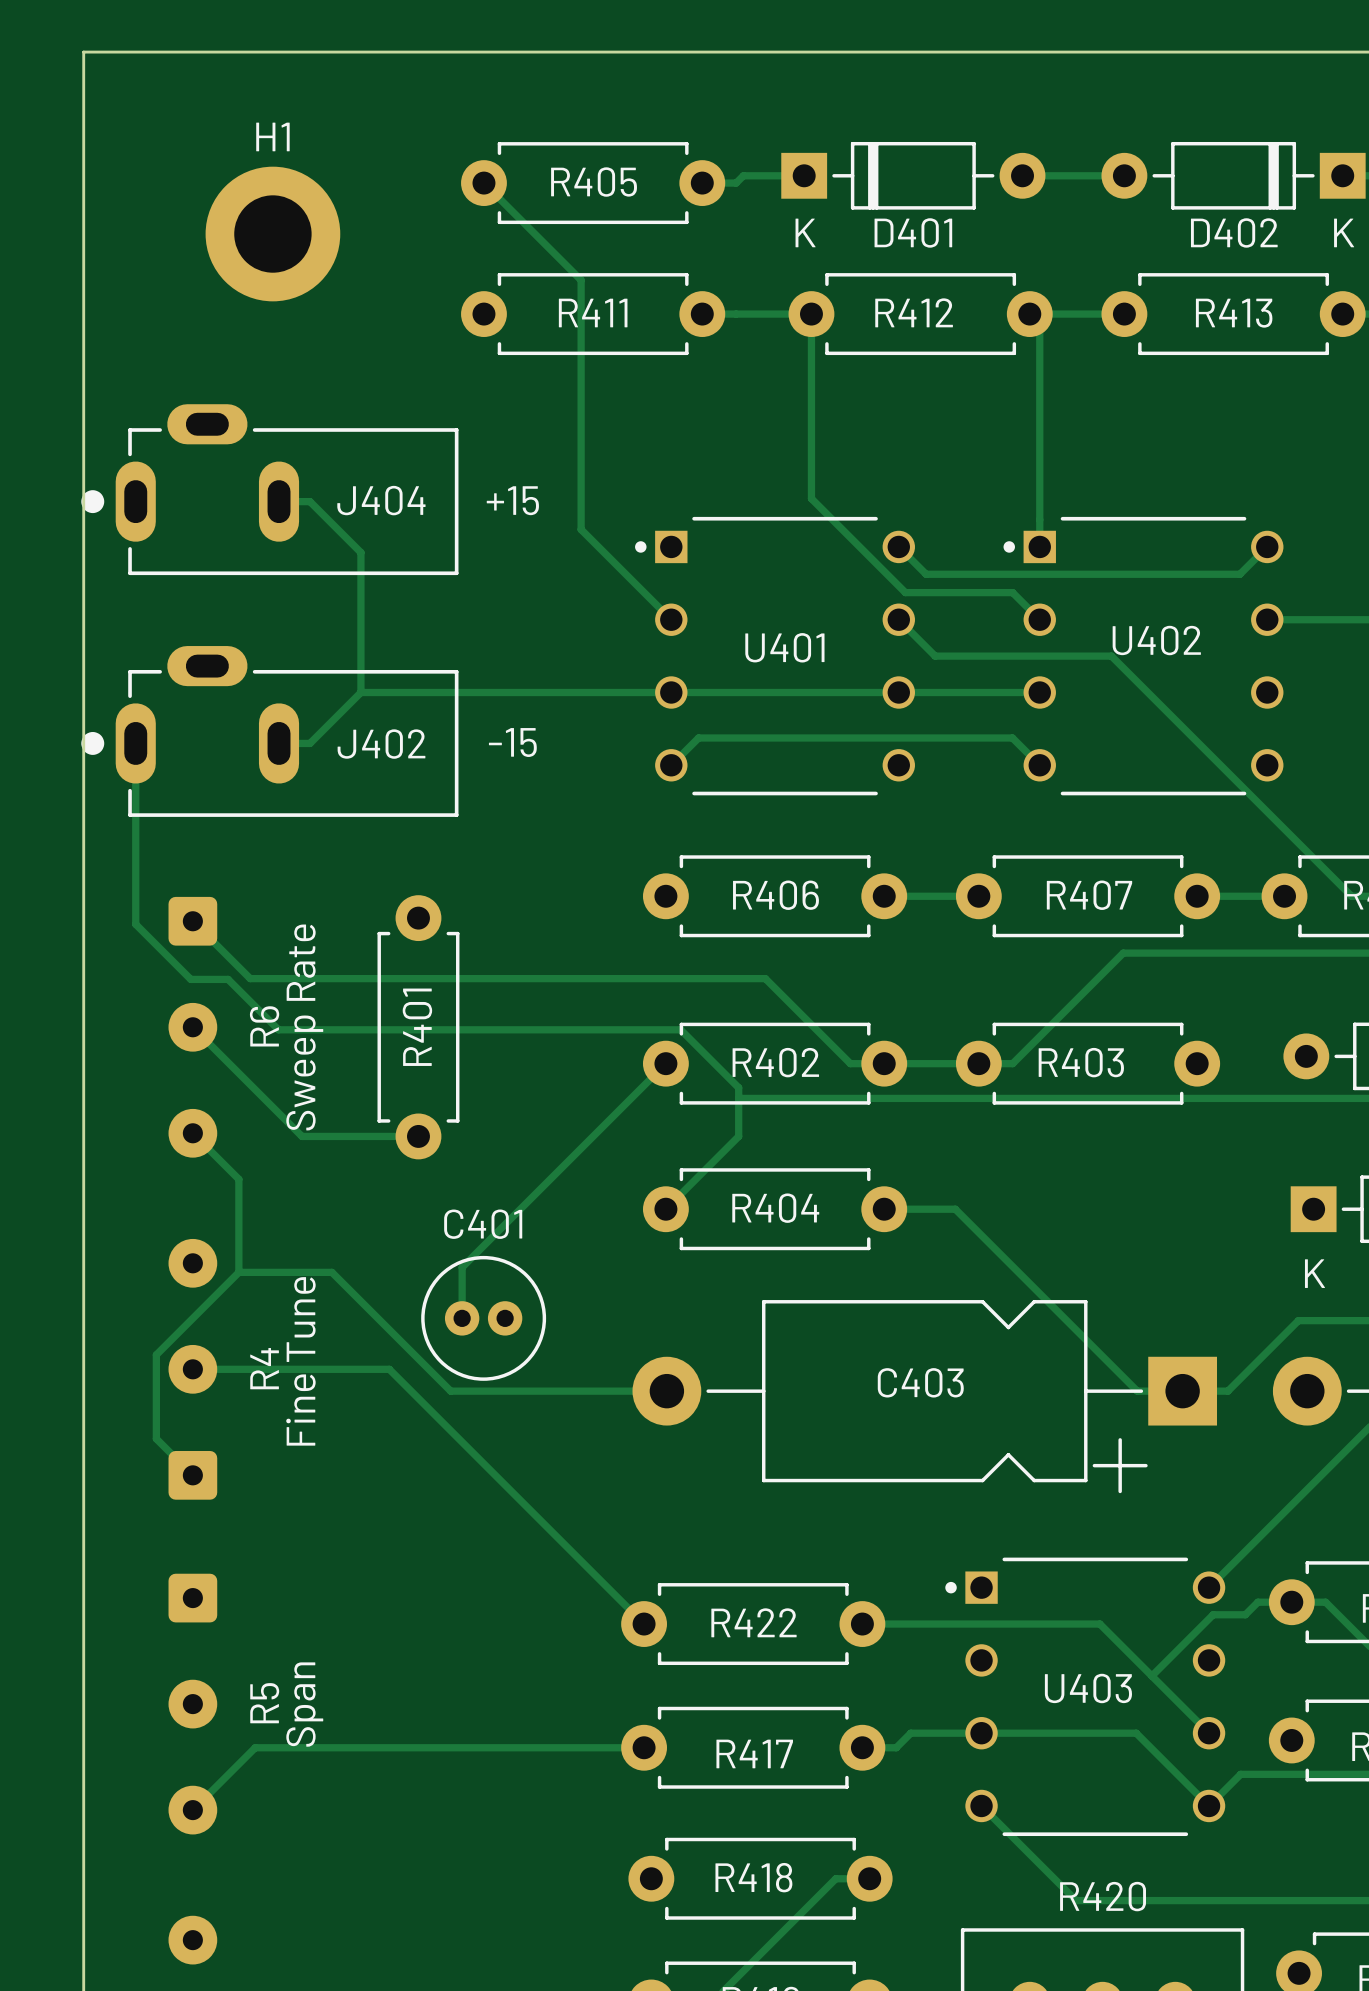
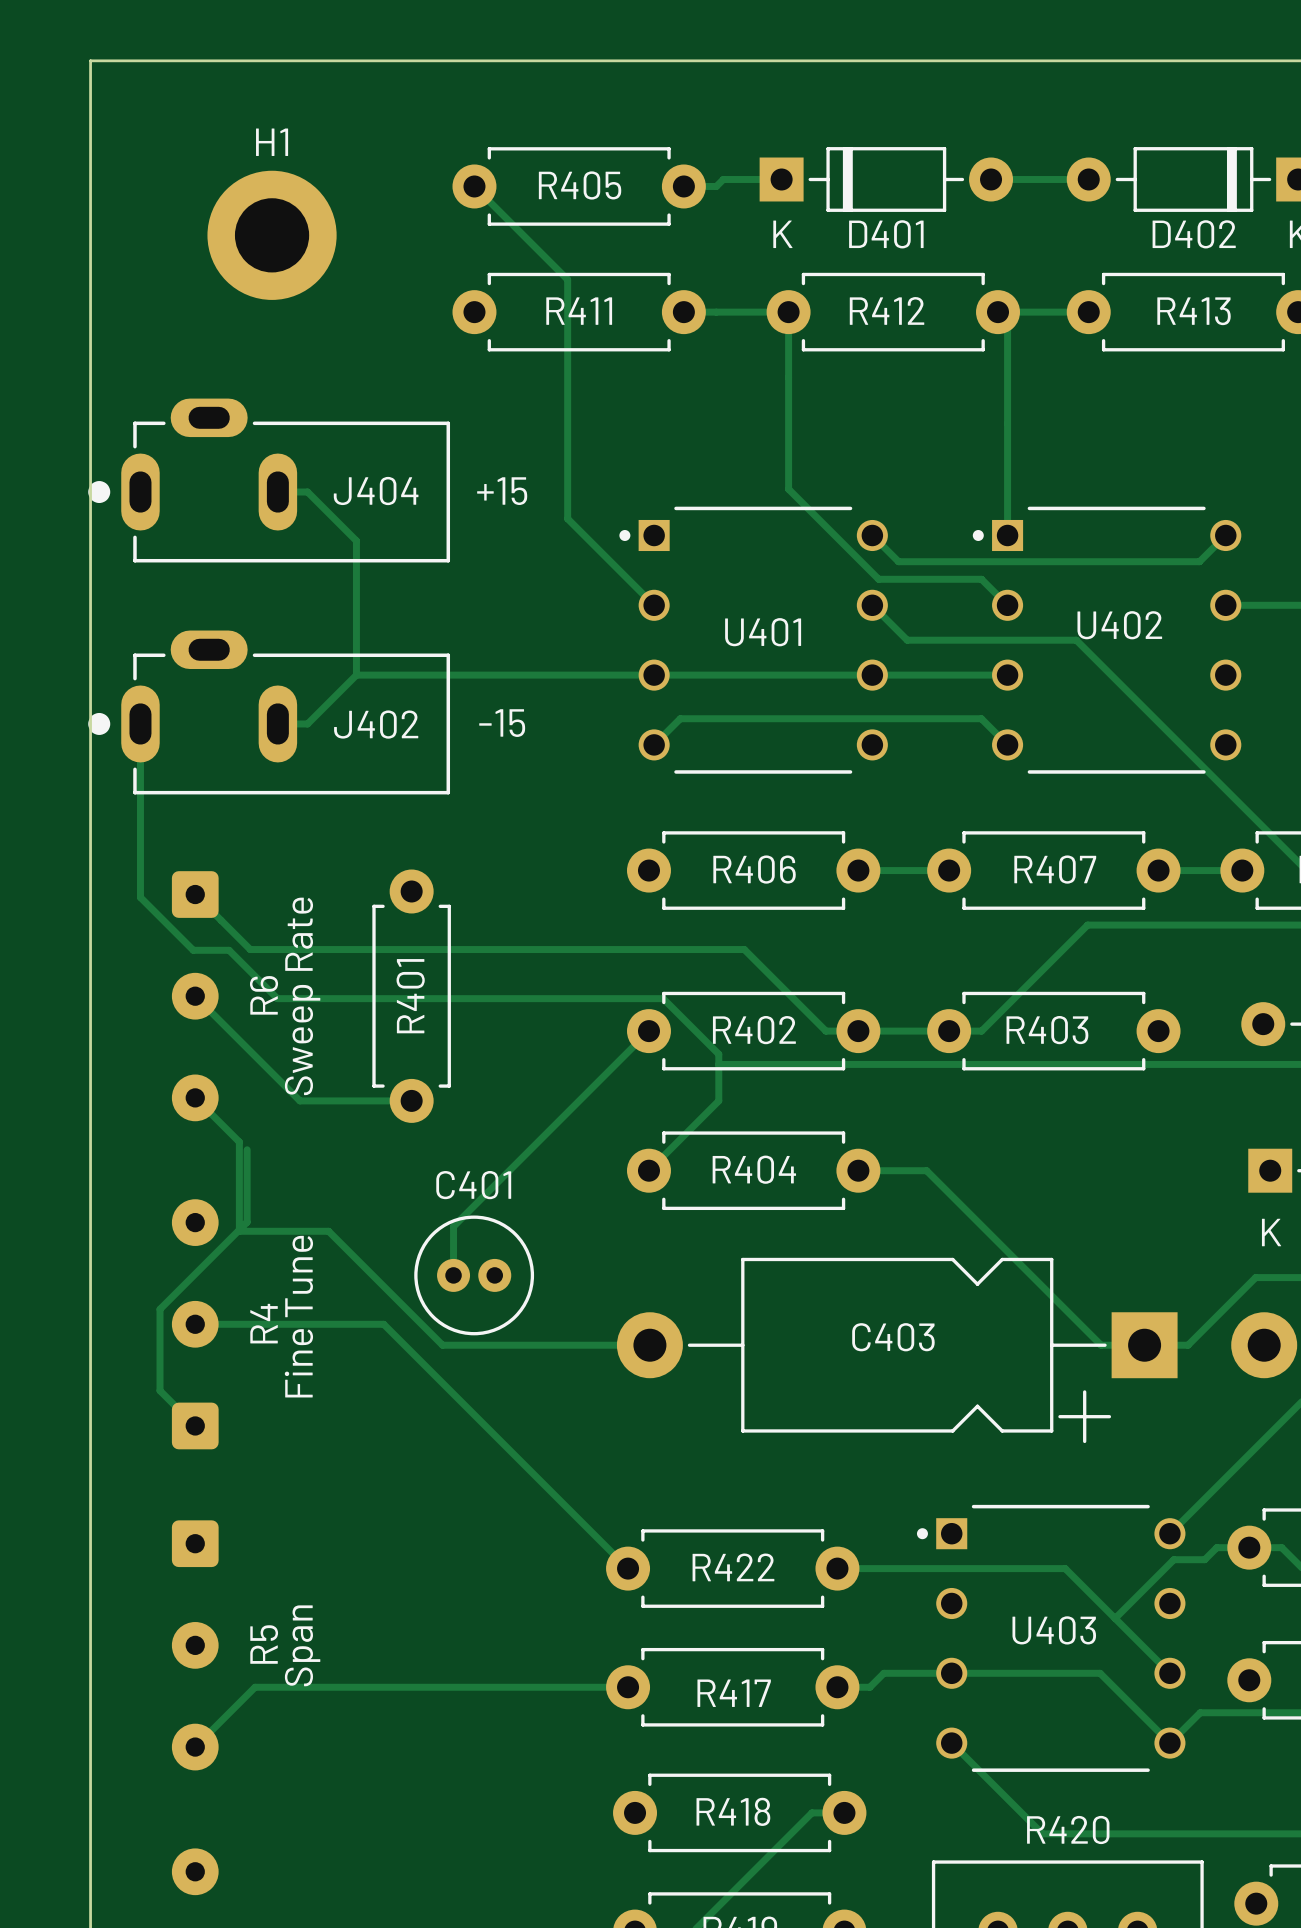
track: (238, 1272) (156, 1354) (156, 1438) -> (247, 1149) (247, 1222) (160, 1309) (160, 1390)

